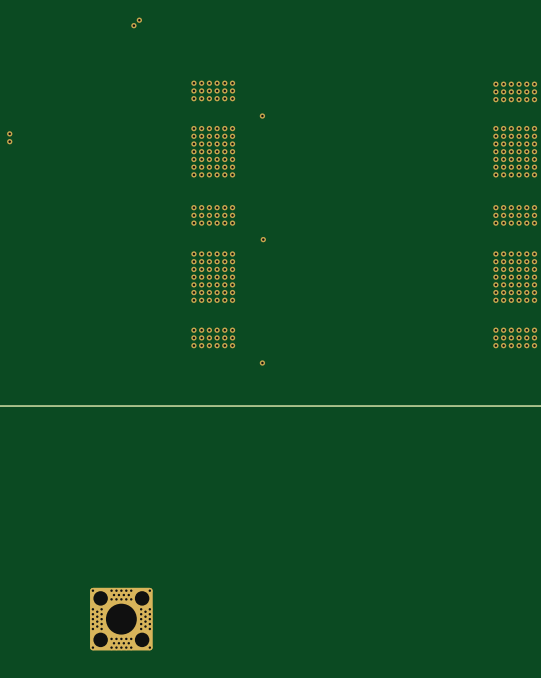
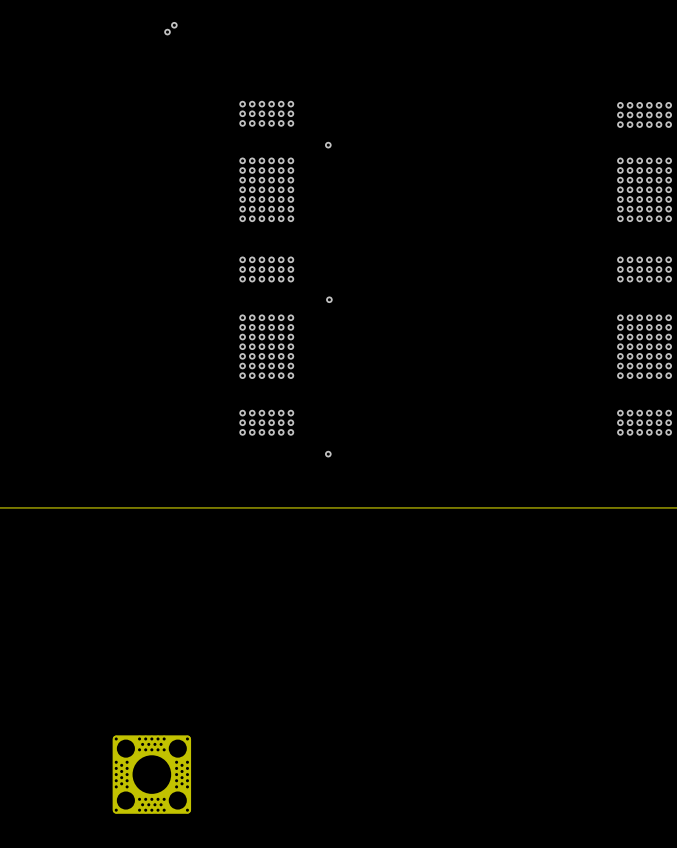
via: (9, 133) -> none
via: (9, 141) -> none

